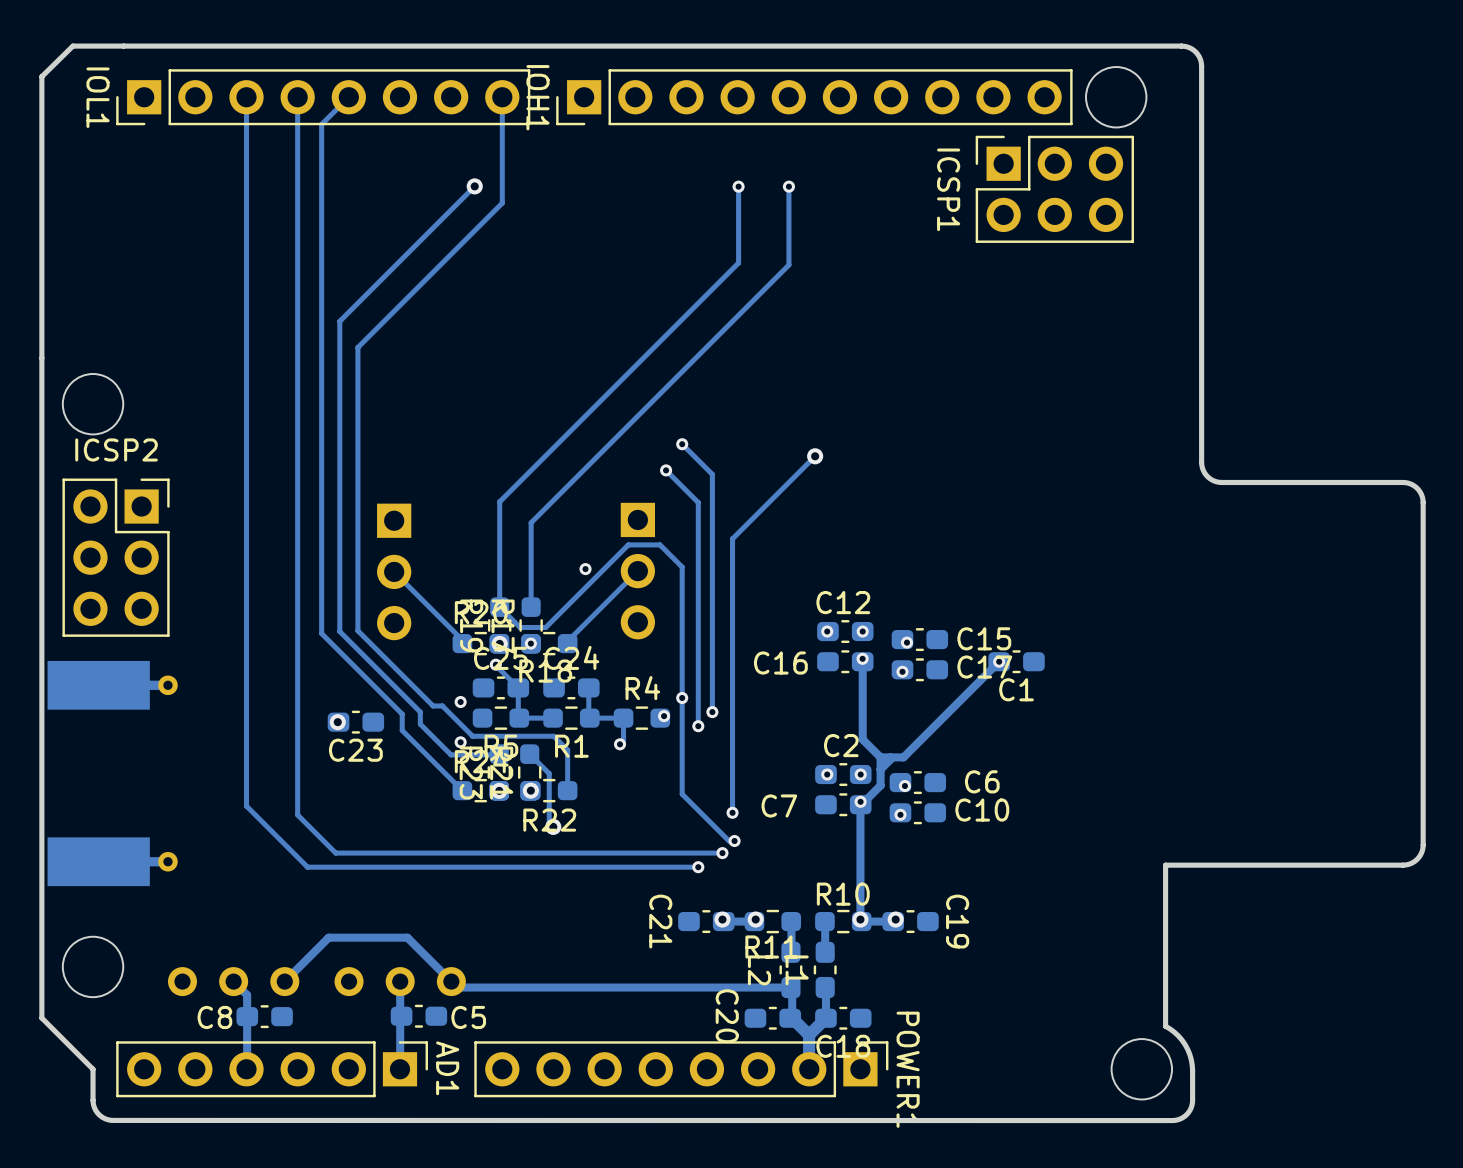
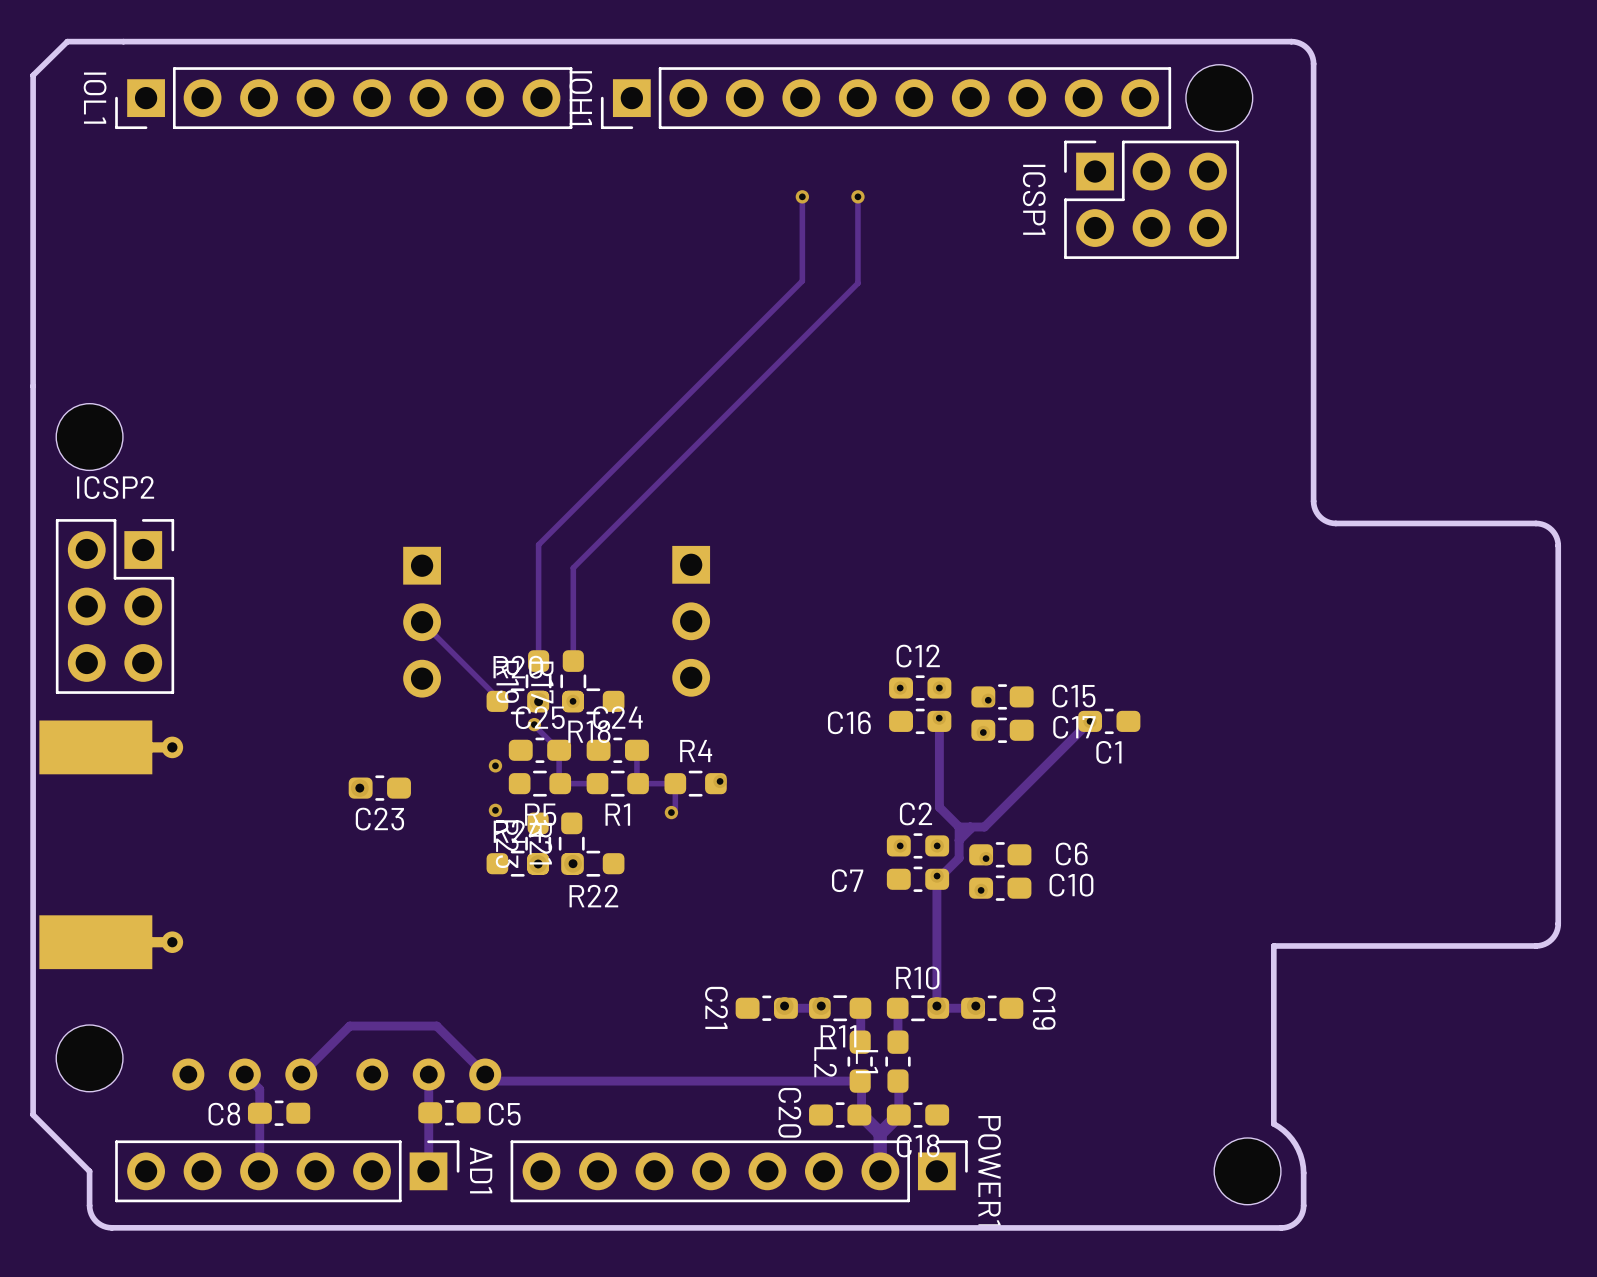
track: (246, 97) (246, 806) (307, 867) (698, 867) -> none
track: (297, 97) (297, 814) (335, 853) (722, 853) -> none
track: (348, 97) (321, 124) (321, 633) (402, 714) (402, 730) (462, 790) -> none
track: (502, 97) (502, 203) (357, 347) (357, 630) (433, 705) (442, 705) (472, 736) (553, 736) (567, 750) (567, 790) -> none
track: (474, 186) (339, 321) (339, 631) (420, 712) (420, 724) (451, 754) (499, 754) -> none
via: (474, 186) -> none
track: (682, 444) (712, 474) (712, 712) -> none
via: (682, 444) -> none
track: (815, 456) (732, 538) (732, 812) -> none
via: (815, 456) -> none
track: (666, 470) (698, 502) (698, 726) -> none
via: (666, 470) -> none
via: (585, 569) -> none
track: (637, 571) (567, 641) (567, 643) -> none
track: (499, 607) (520, 627) (545, 627) (628, 544) (660, 544) (682, 567) (682, 794) (729, 841) (734, 841) -> none
via: (682, 697) -> none
via: (712, 712) -> none
via: (698, 726) -> none
track: (529, 754) (549, 773) (549, 822) (553, 826) -> none
via: (732, 812) -> none
via: (553, 826) -> none
via: (734, 841) -> none
via: (722, 853) -> none
via: (698, 867) -> none

